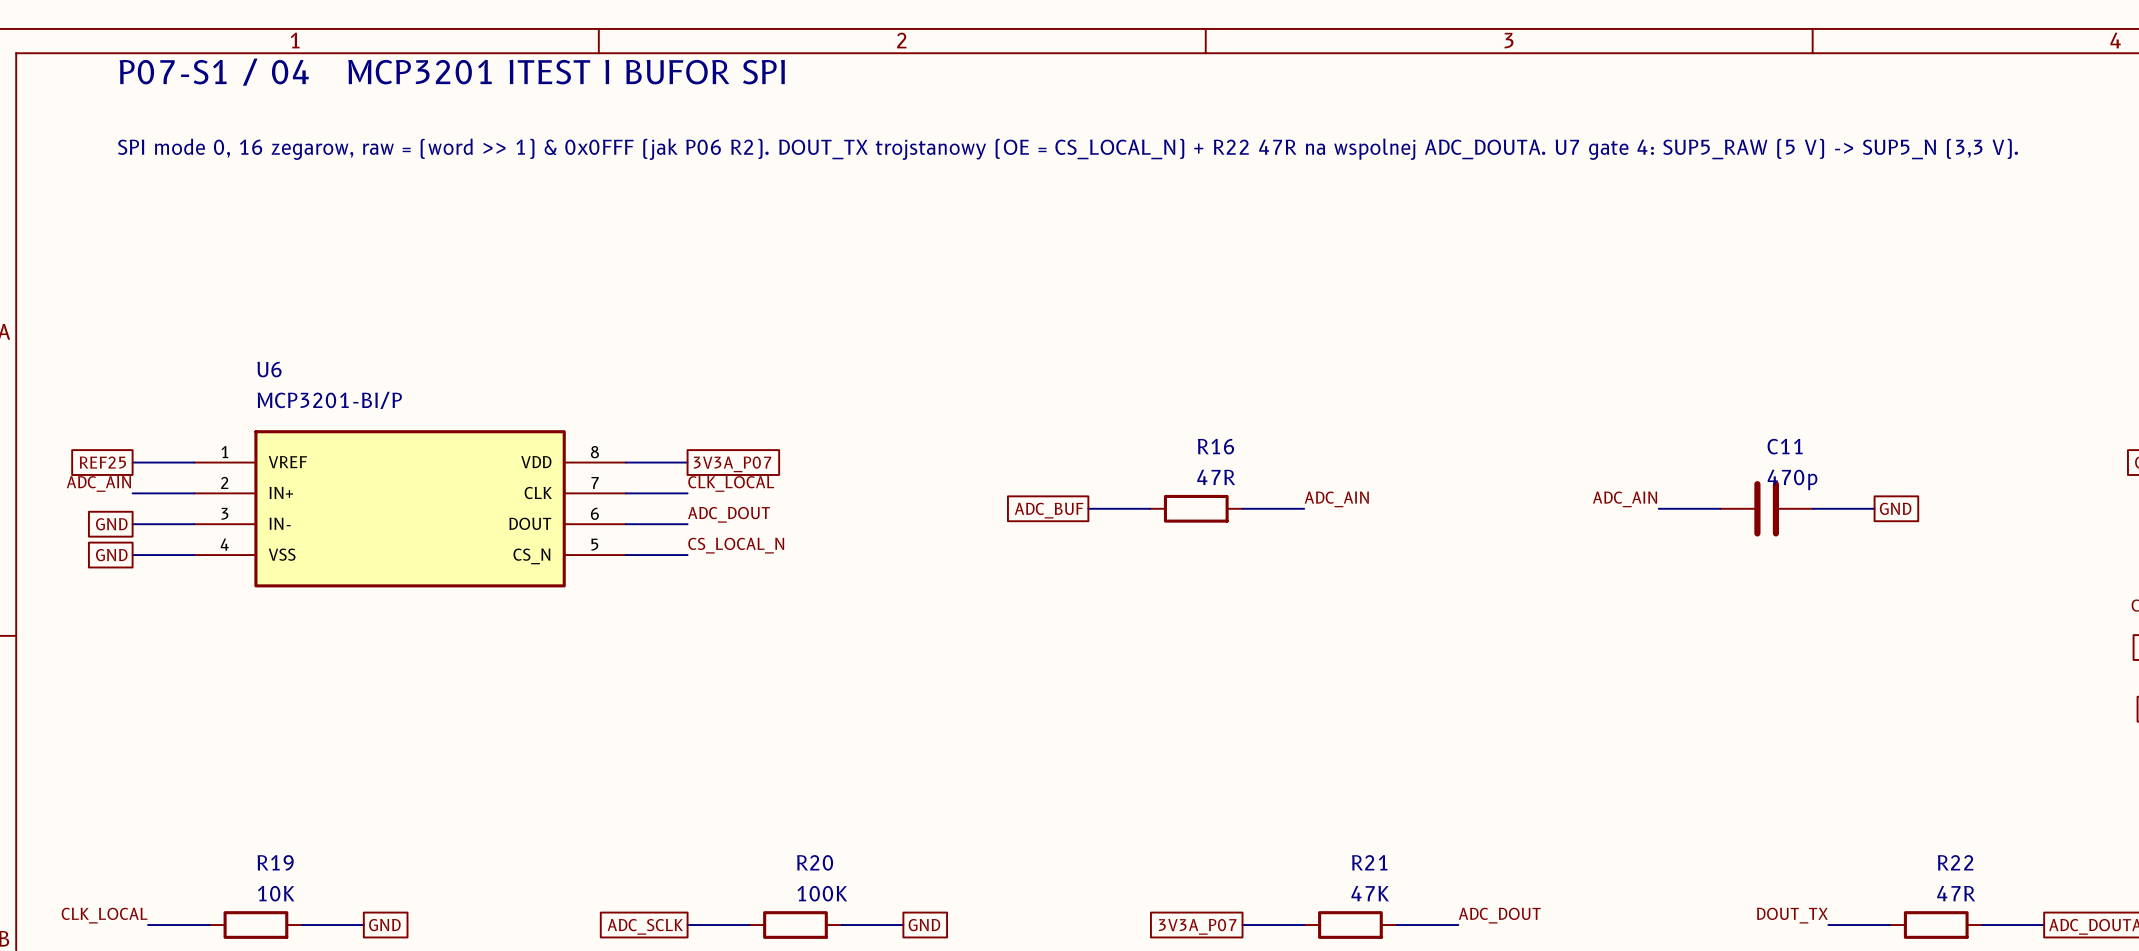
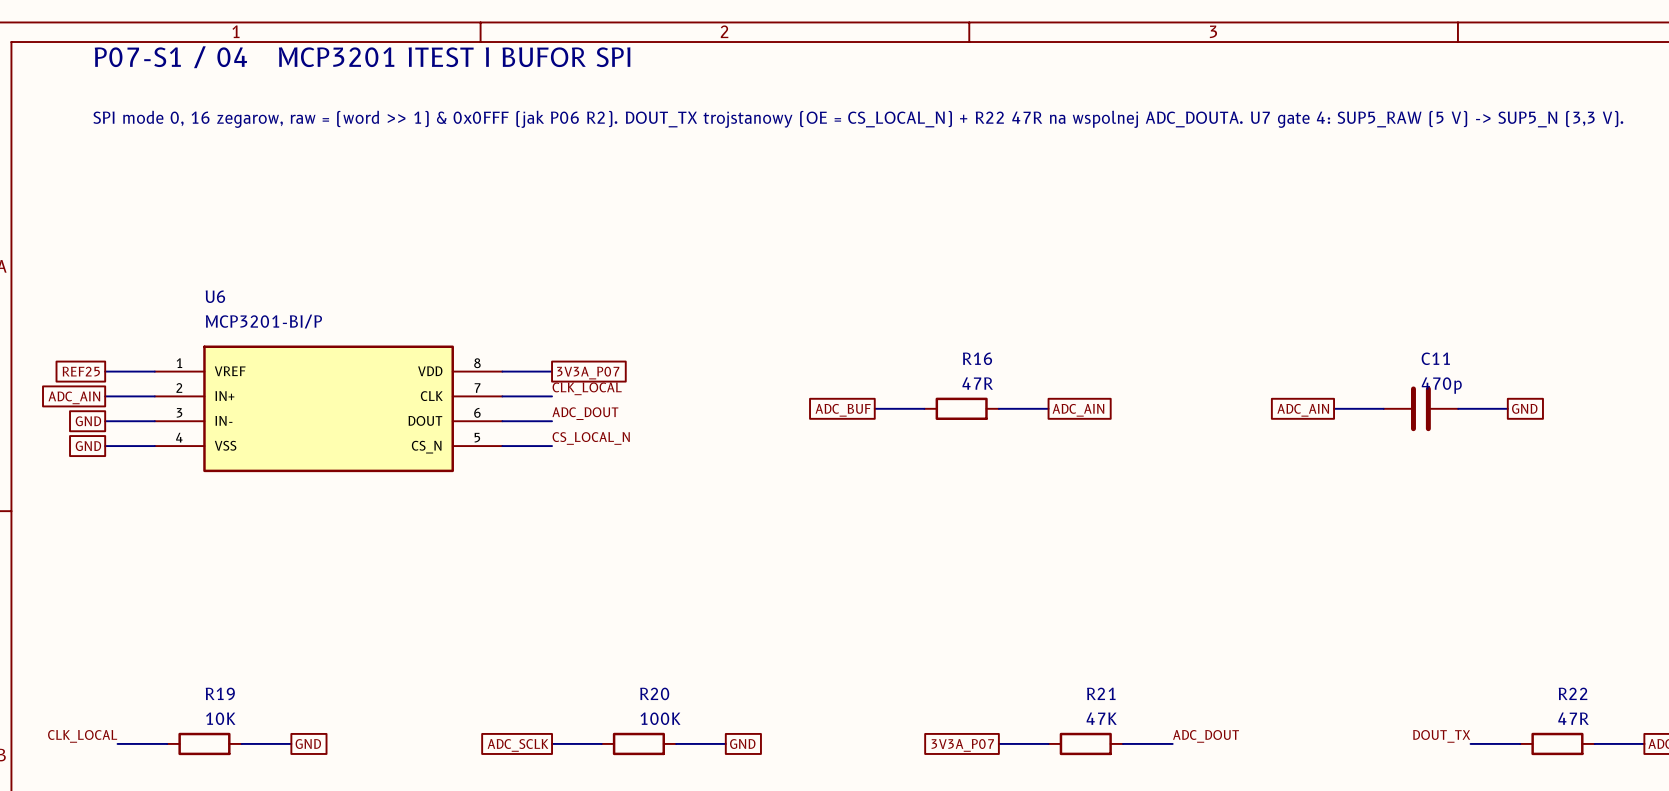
label: ADC_AIN (98, 483) -> none
global label: none -> ADC_AIN (74, 397)
label: ADC_AIN (1336, 499) -> none
label: ADC_AIN (1625, 499) -> none
global label: none -> ADC_AIN (1078, 410)
global label: none -> ADC_AIN (1303, 410)

